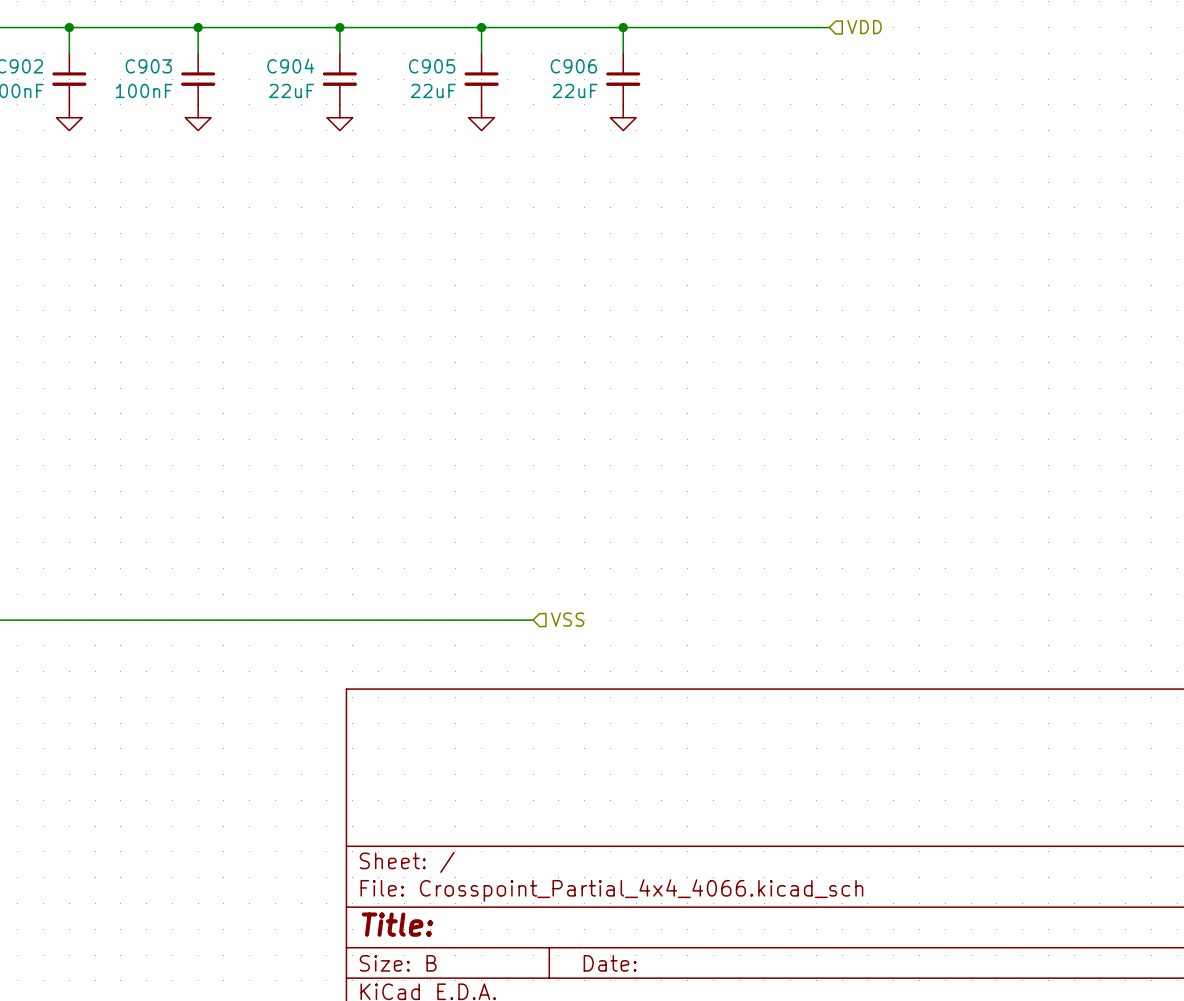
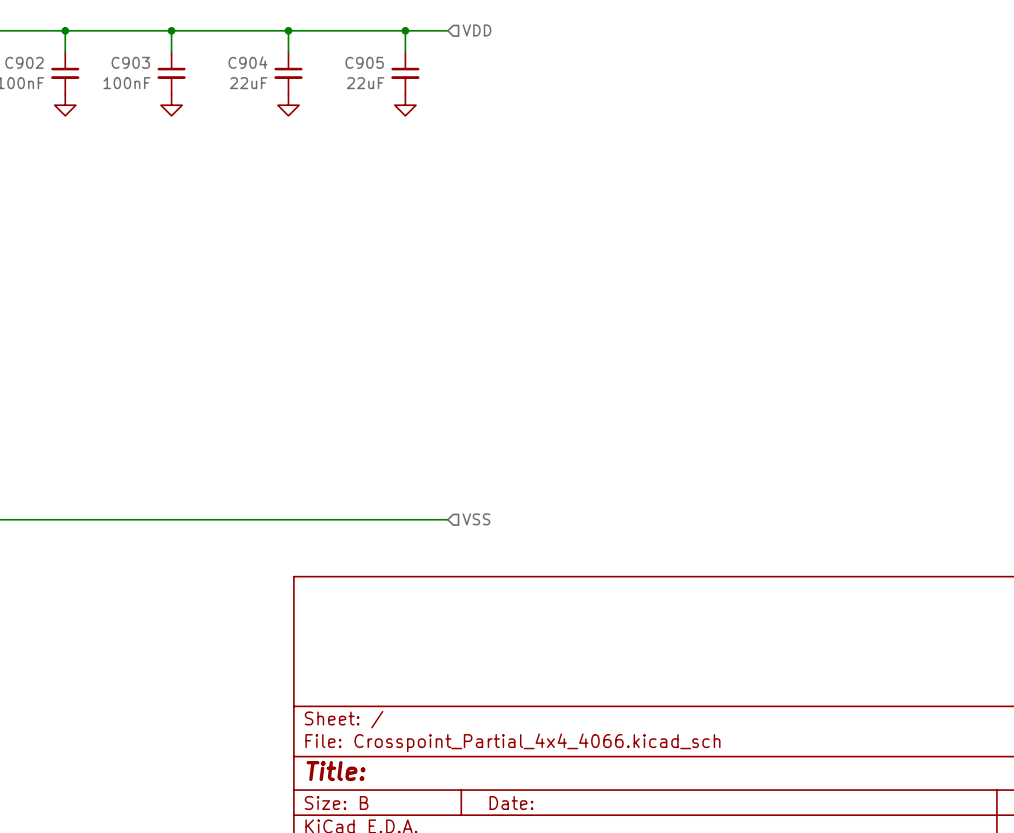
wire: (533, 27) (829, 27) -> none
hierarchical label: none -> VDD (476, 30)
wire: (623, 27) (623, 53) -> none
junction: (623, 27) -> none
hierarchical label: VDD (864, 27) -> none
C906: 22uF (623, 79) -> none
power symbol: (623, 117) -> none

